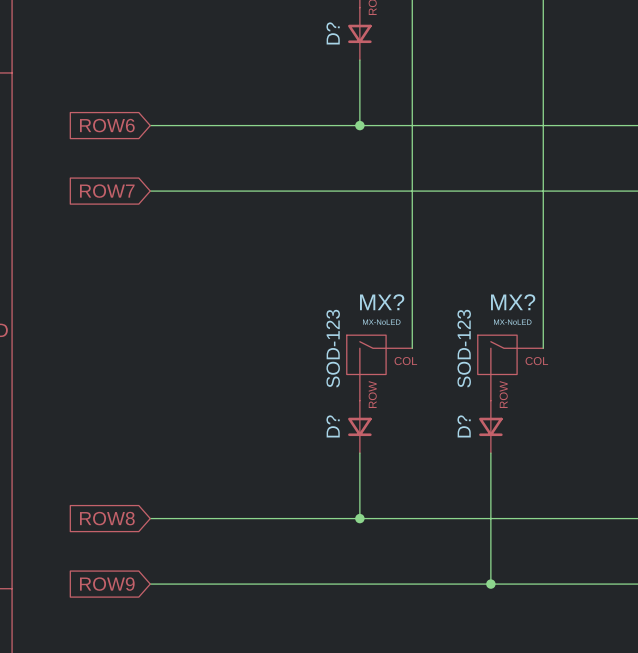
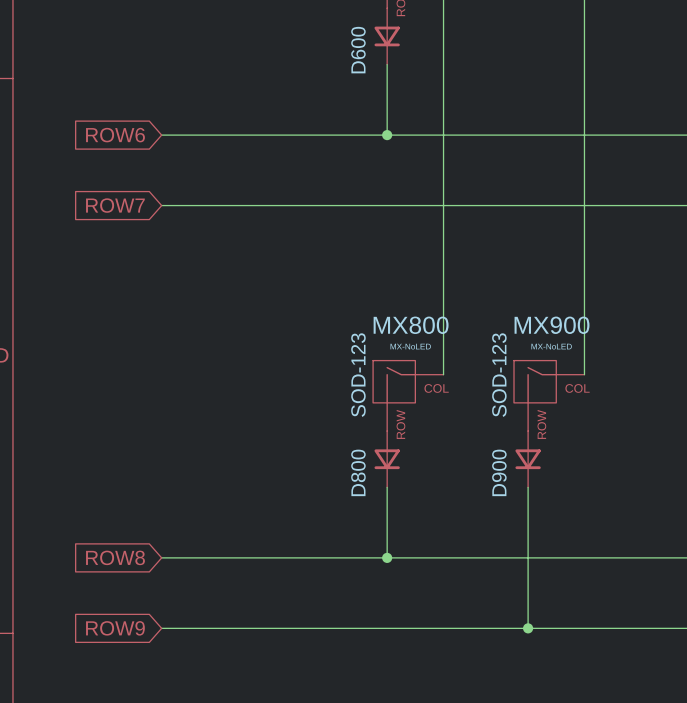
D? name: D? (333, 33) -> D600 (358, 50)
MX? name: MX? (382, 302) -> MX800 (411, 325)
MX? name: MX? (513, 302) -> MX900 (552, 325)
D? name: D? (333, 426) -> D800 (358, 472)
D? name: D? (464, 426) -> D900 (499, 472)

